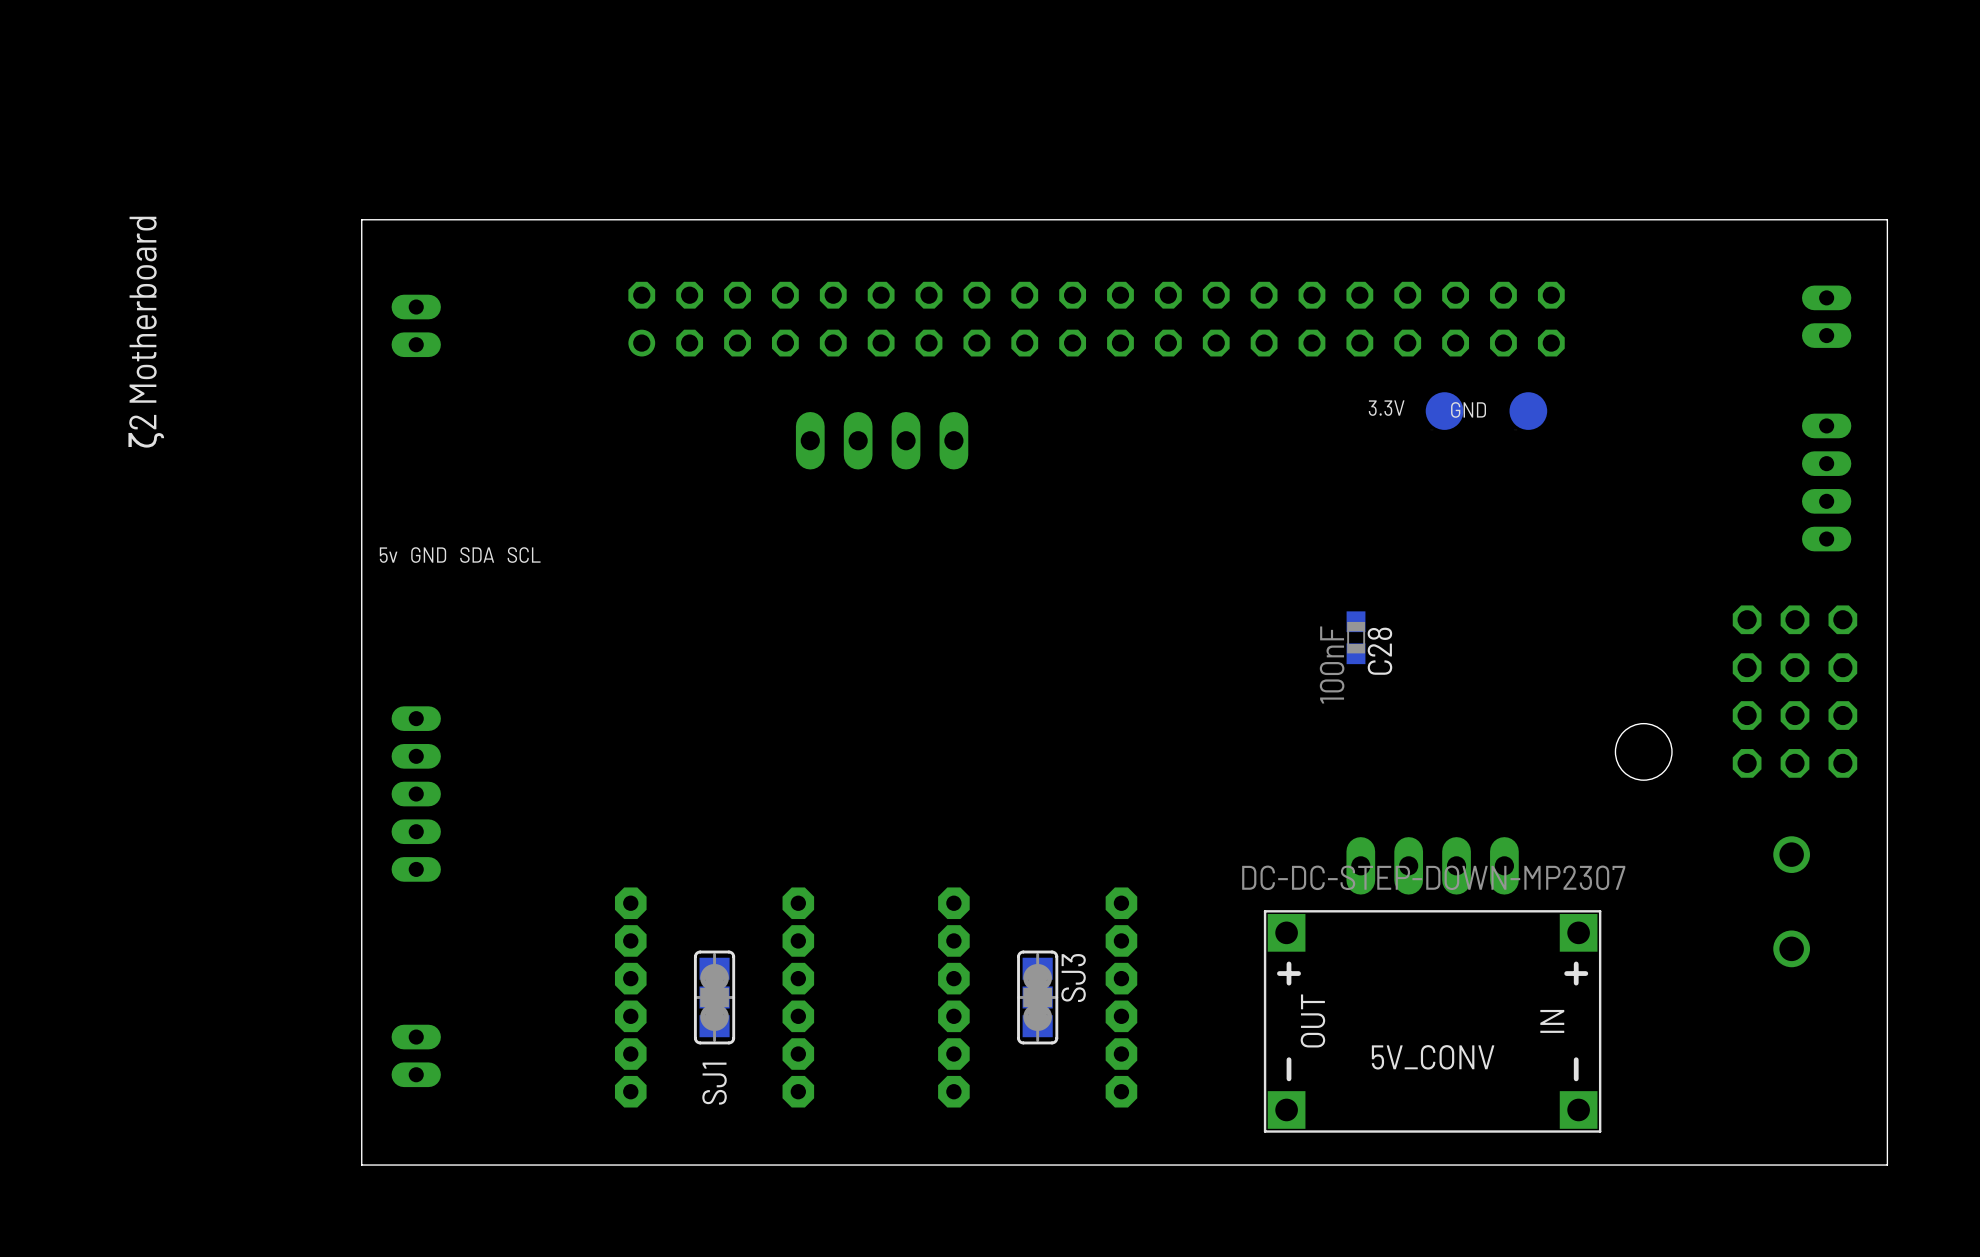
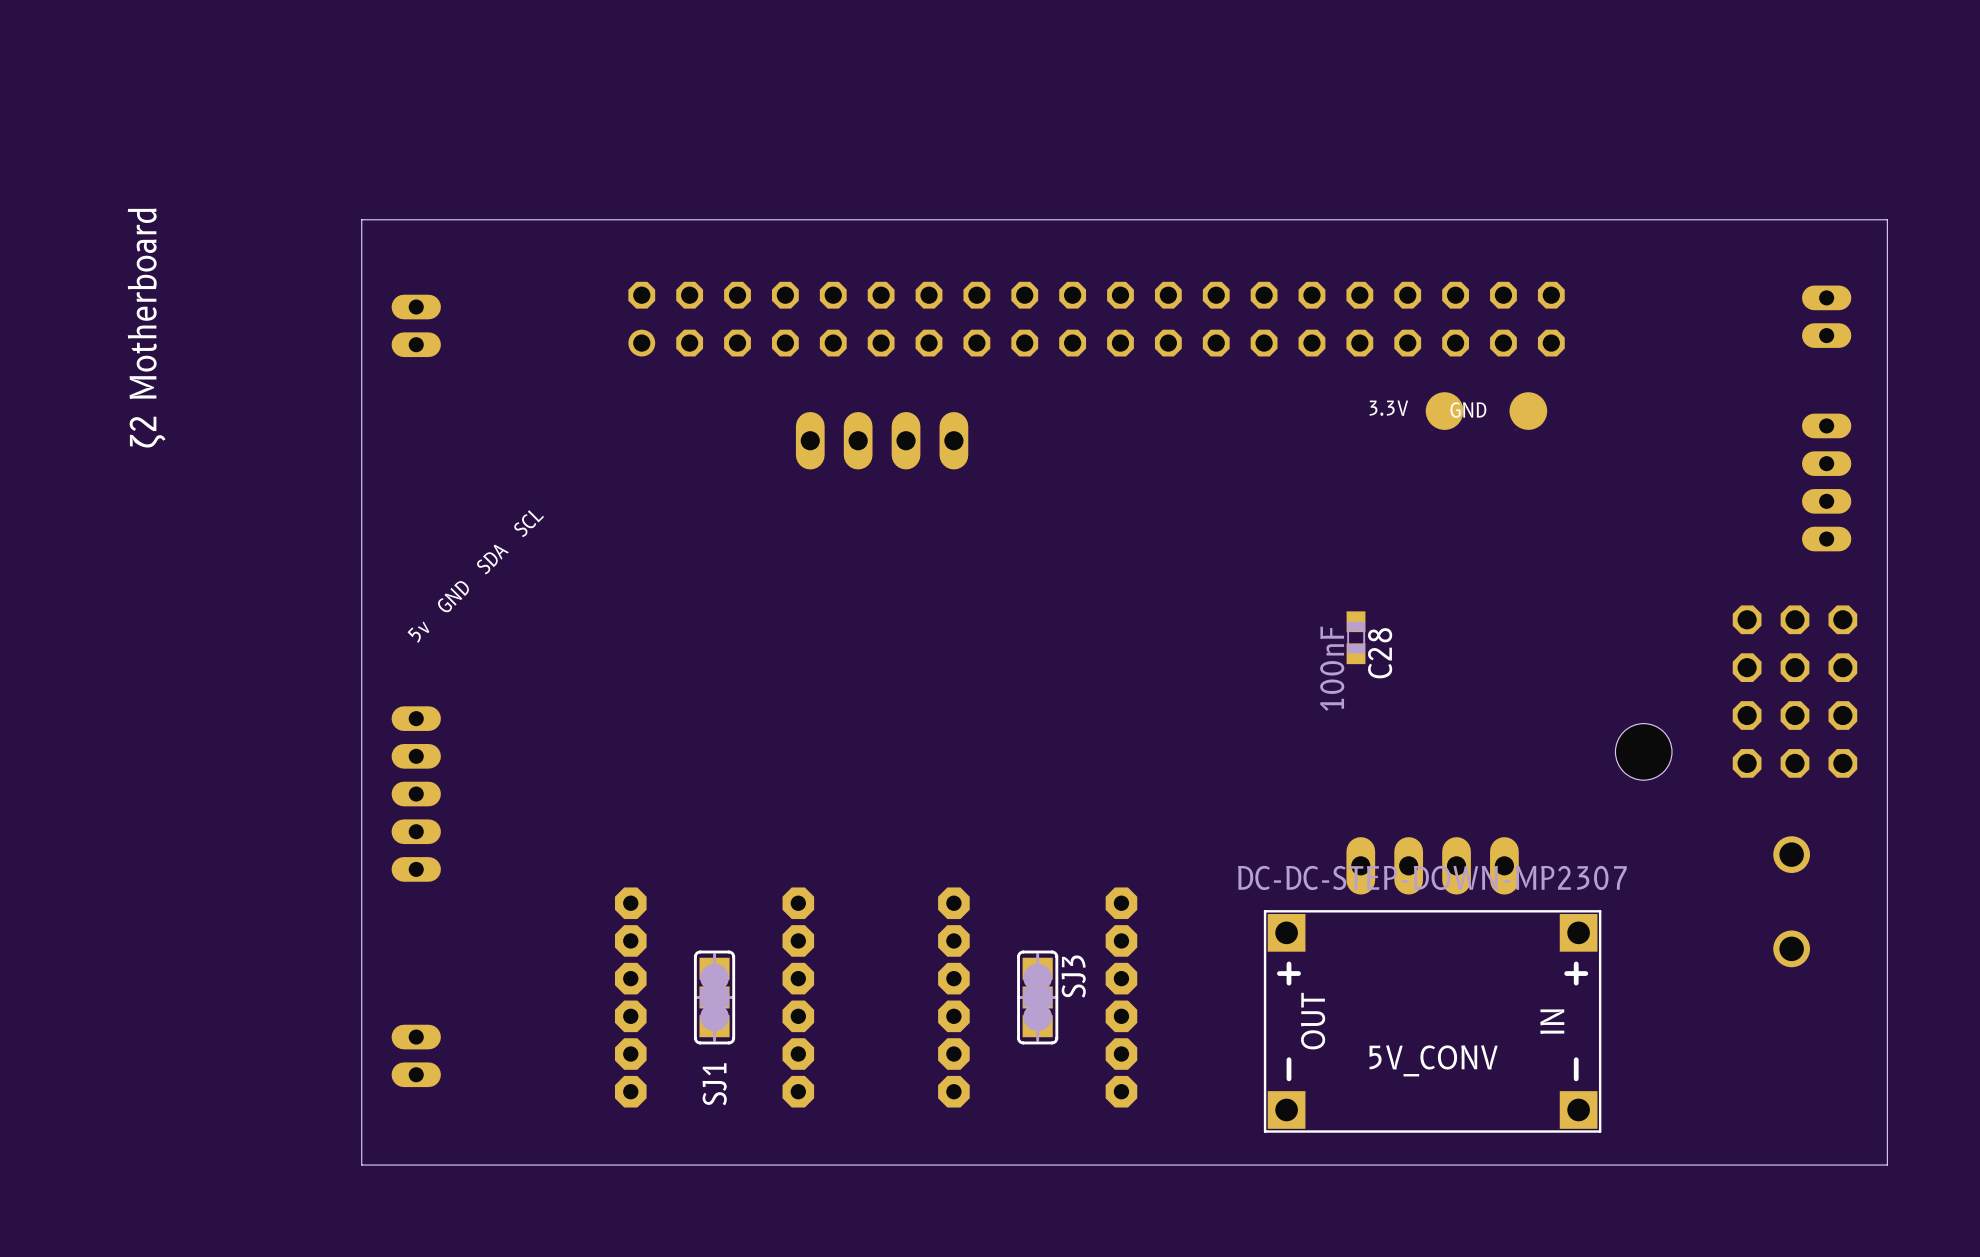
text rotation: 0° (460, 555) -> 45° counterclockwise (475, 576)

